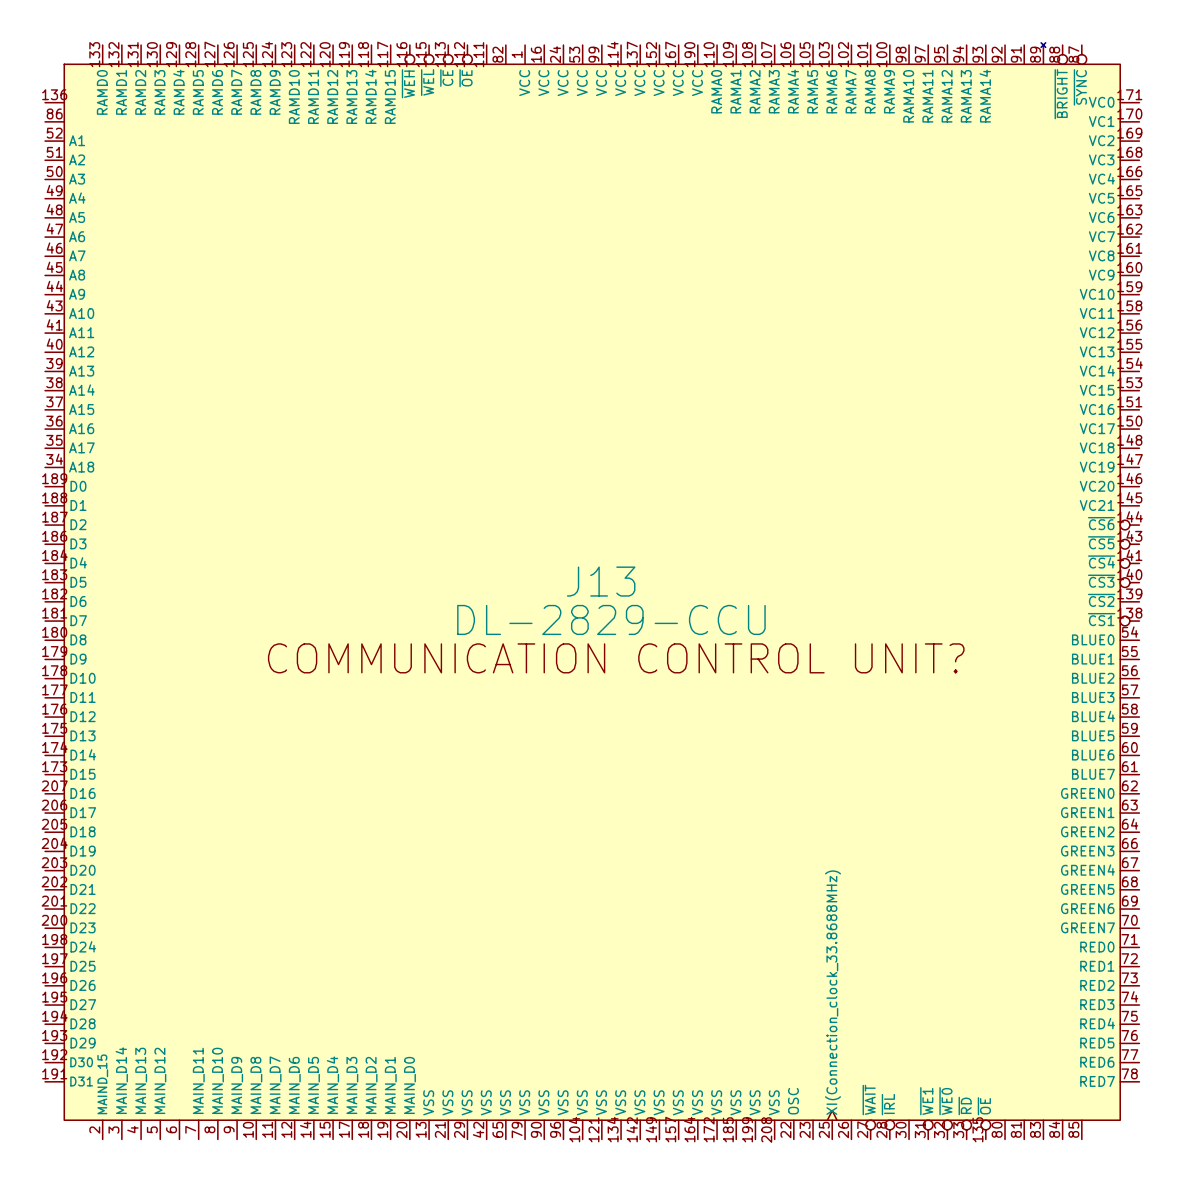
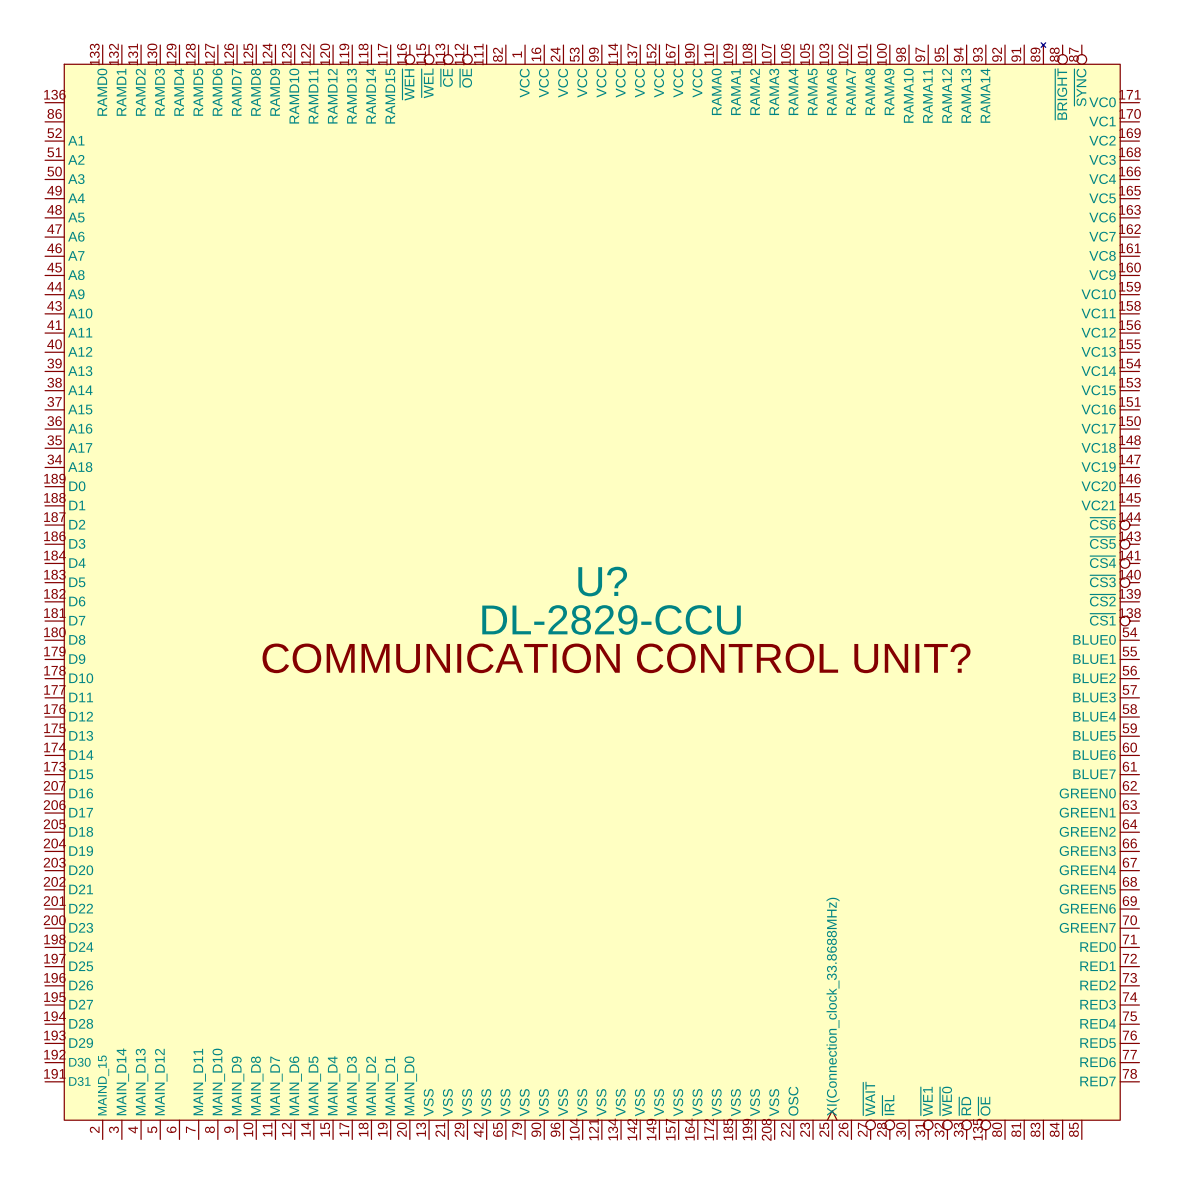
J13 name: J13 (601, 581) -> U? (602, 581)

